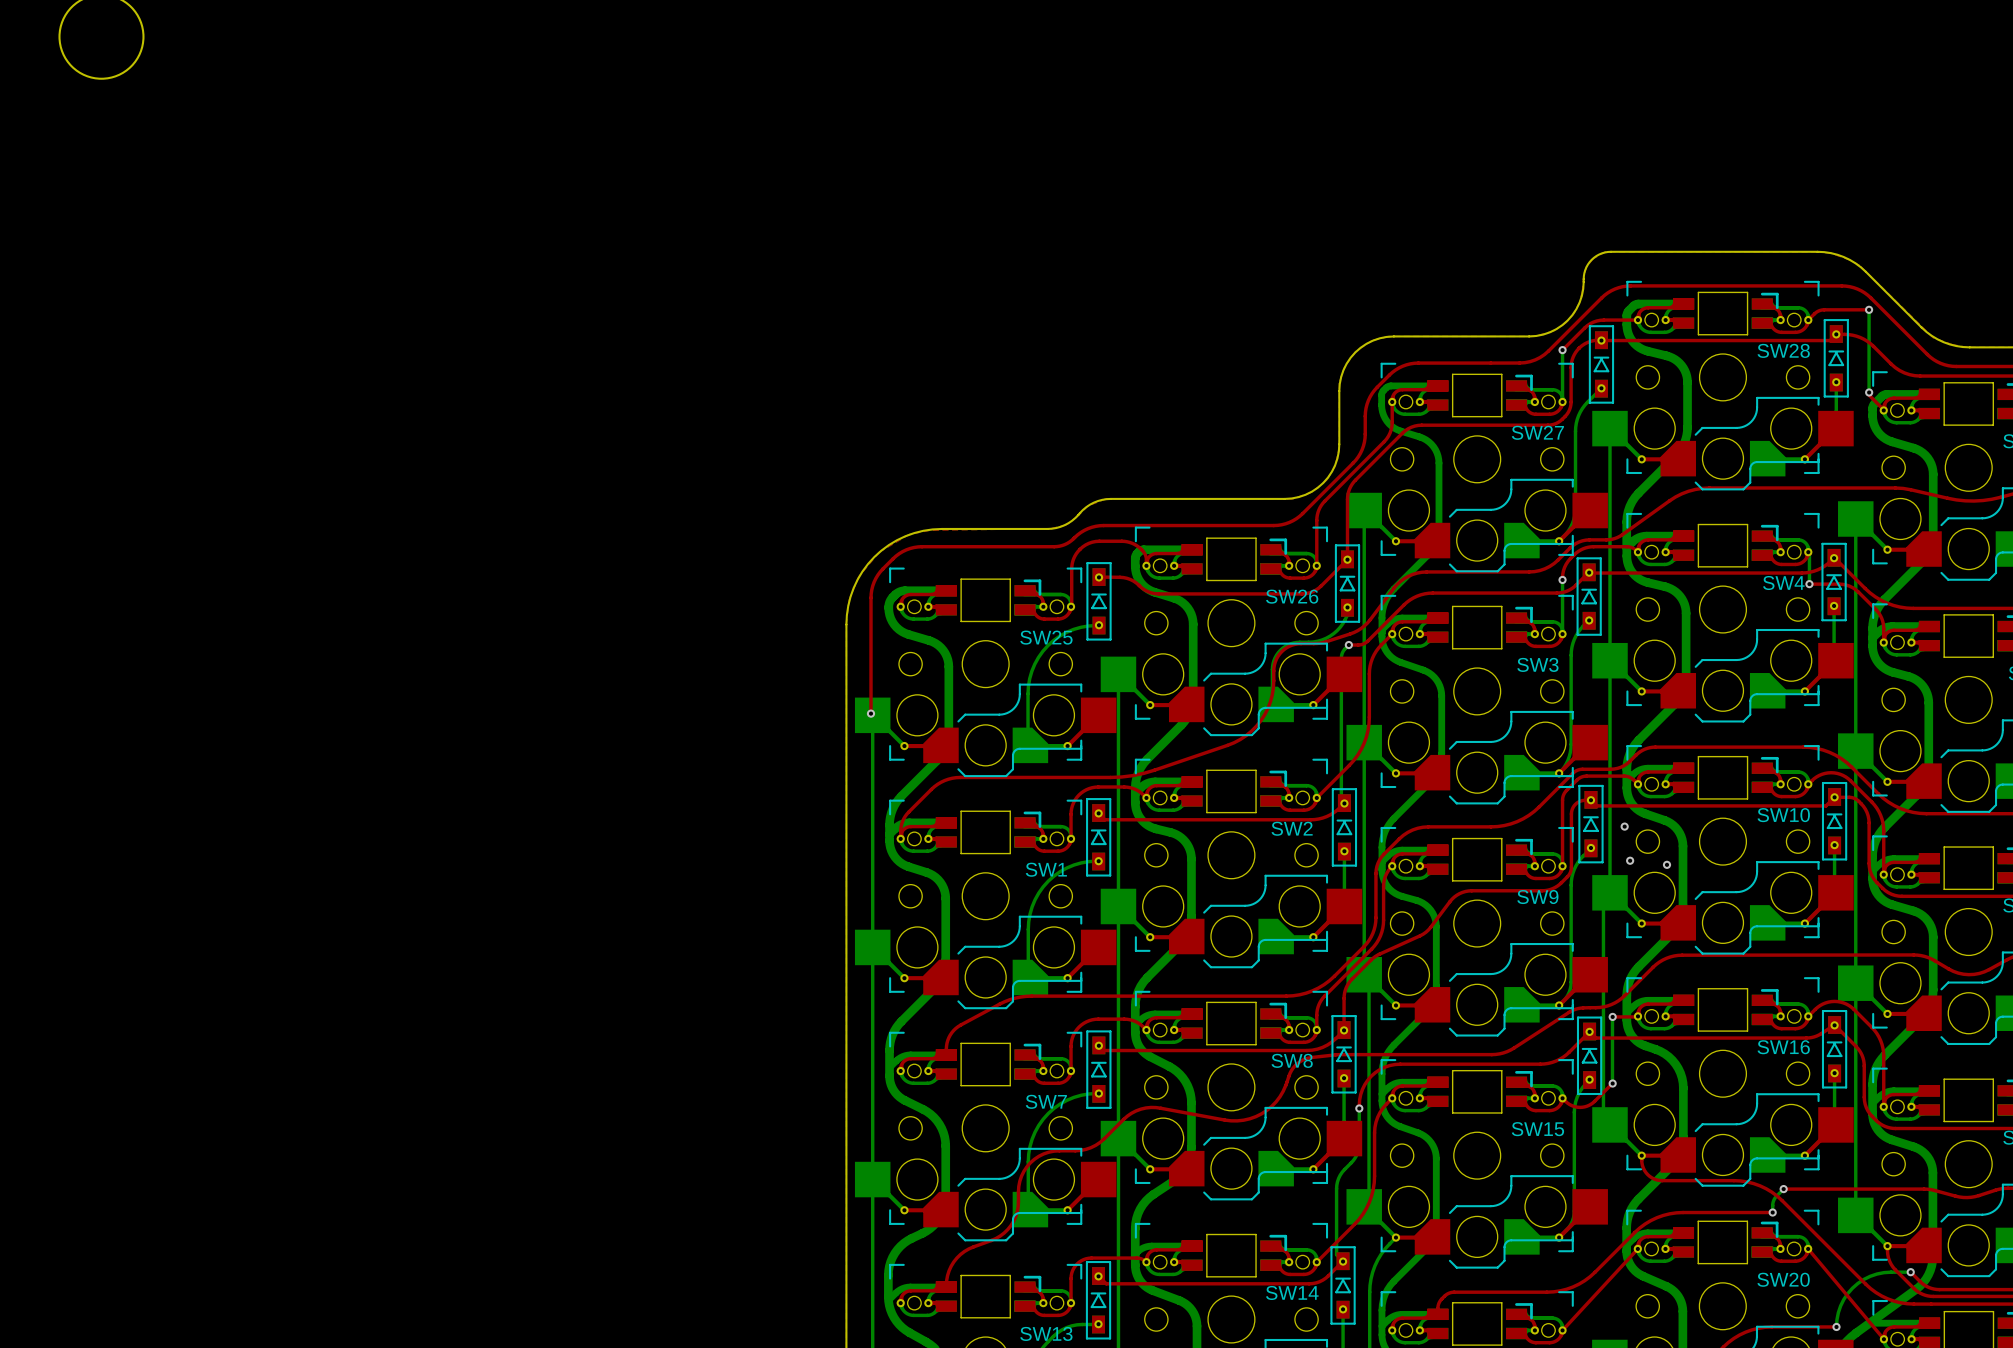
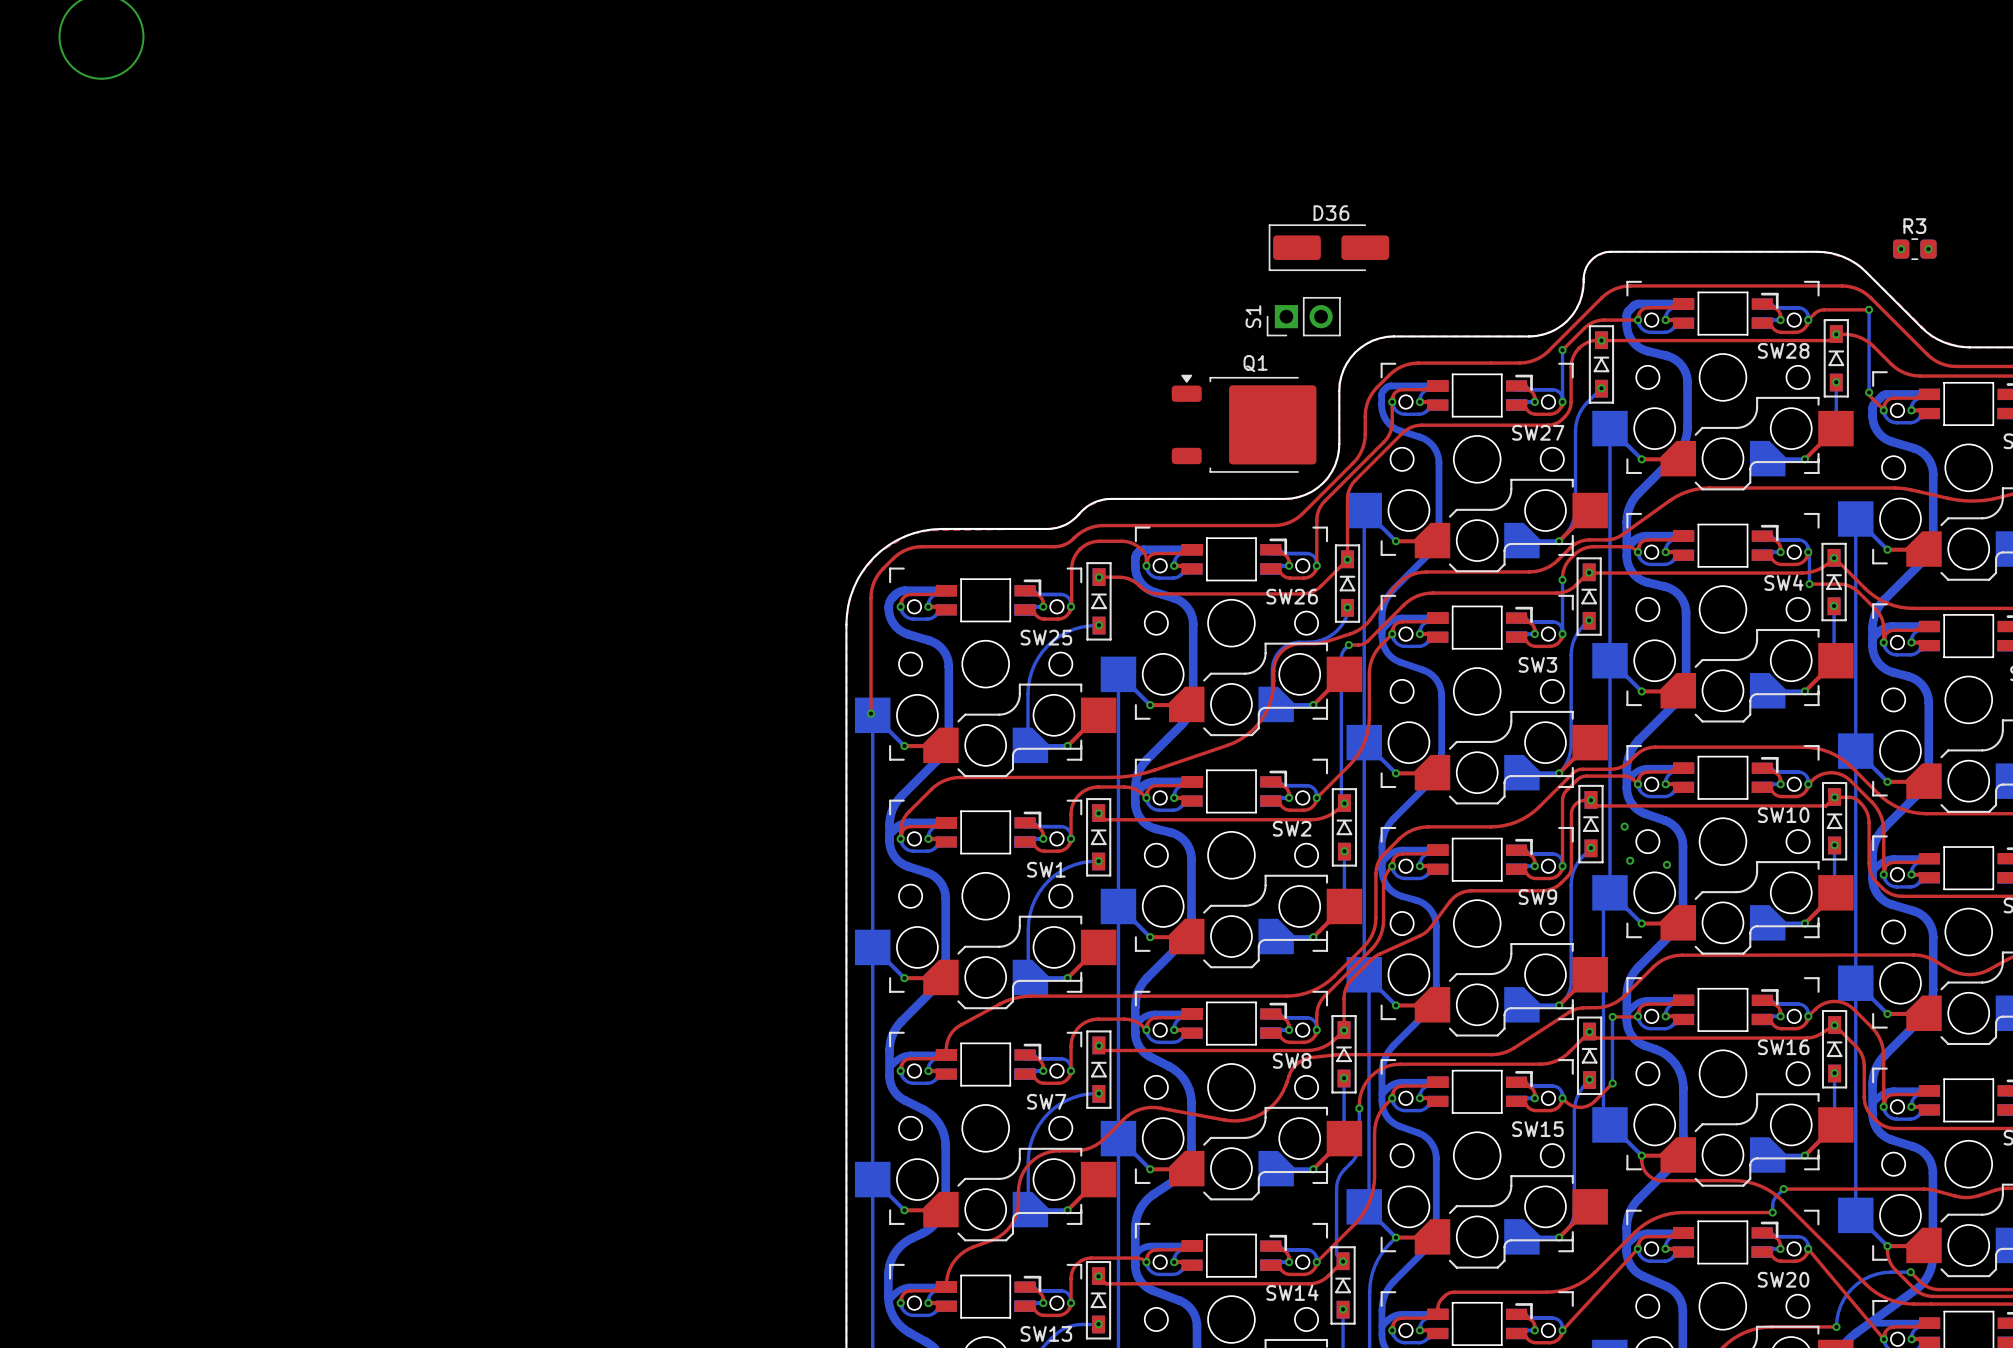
D36: none -> (1328, 247)
R3: none -> (1914, 249)
S1: none -> (1303, 316)
Q1: none -> (1244, 423)

